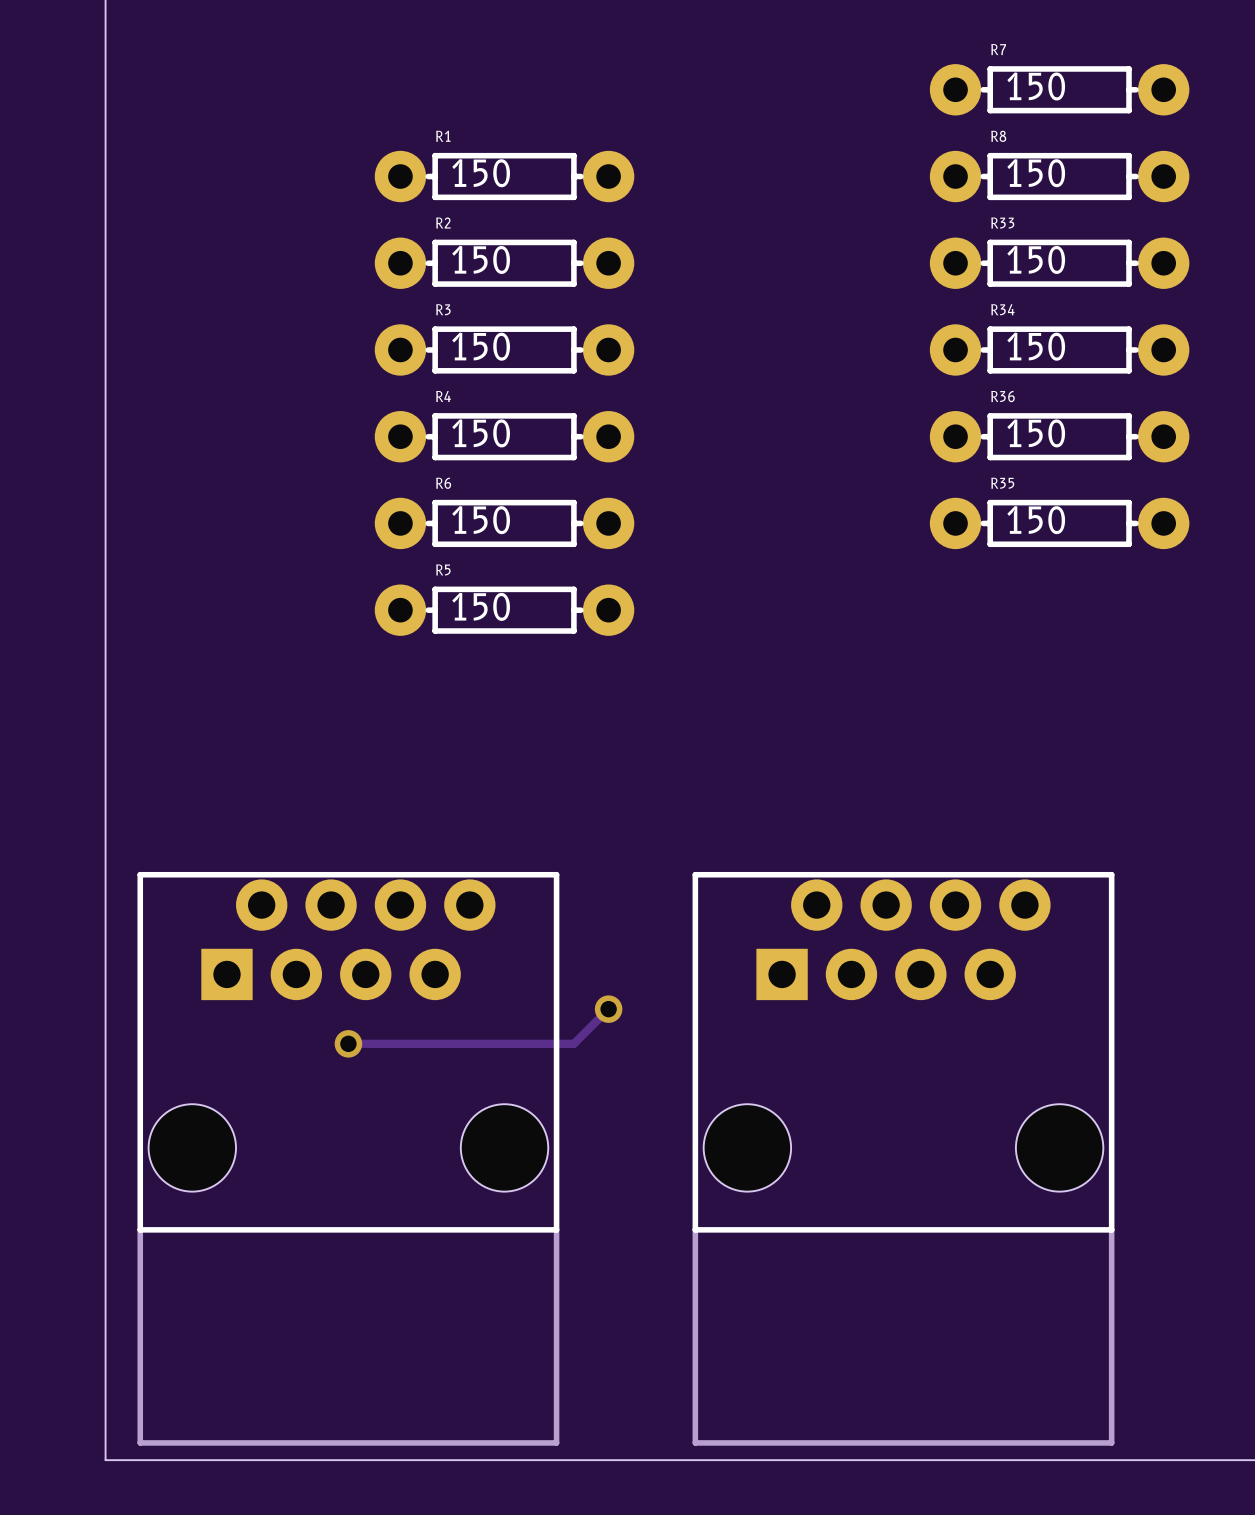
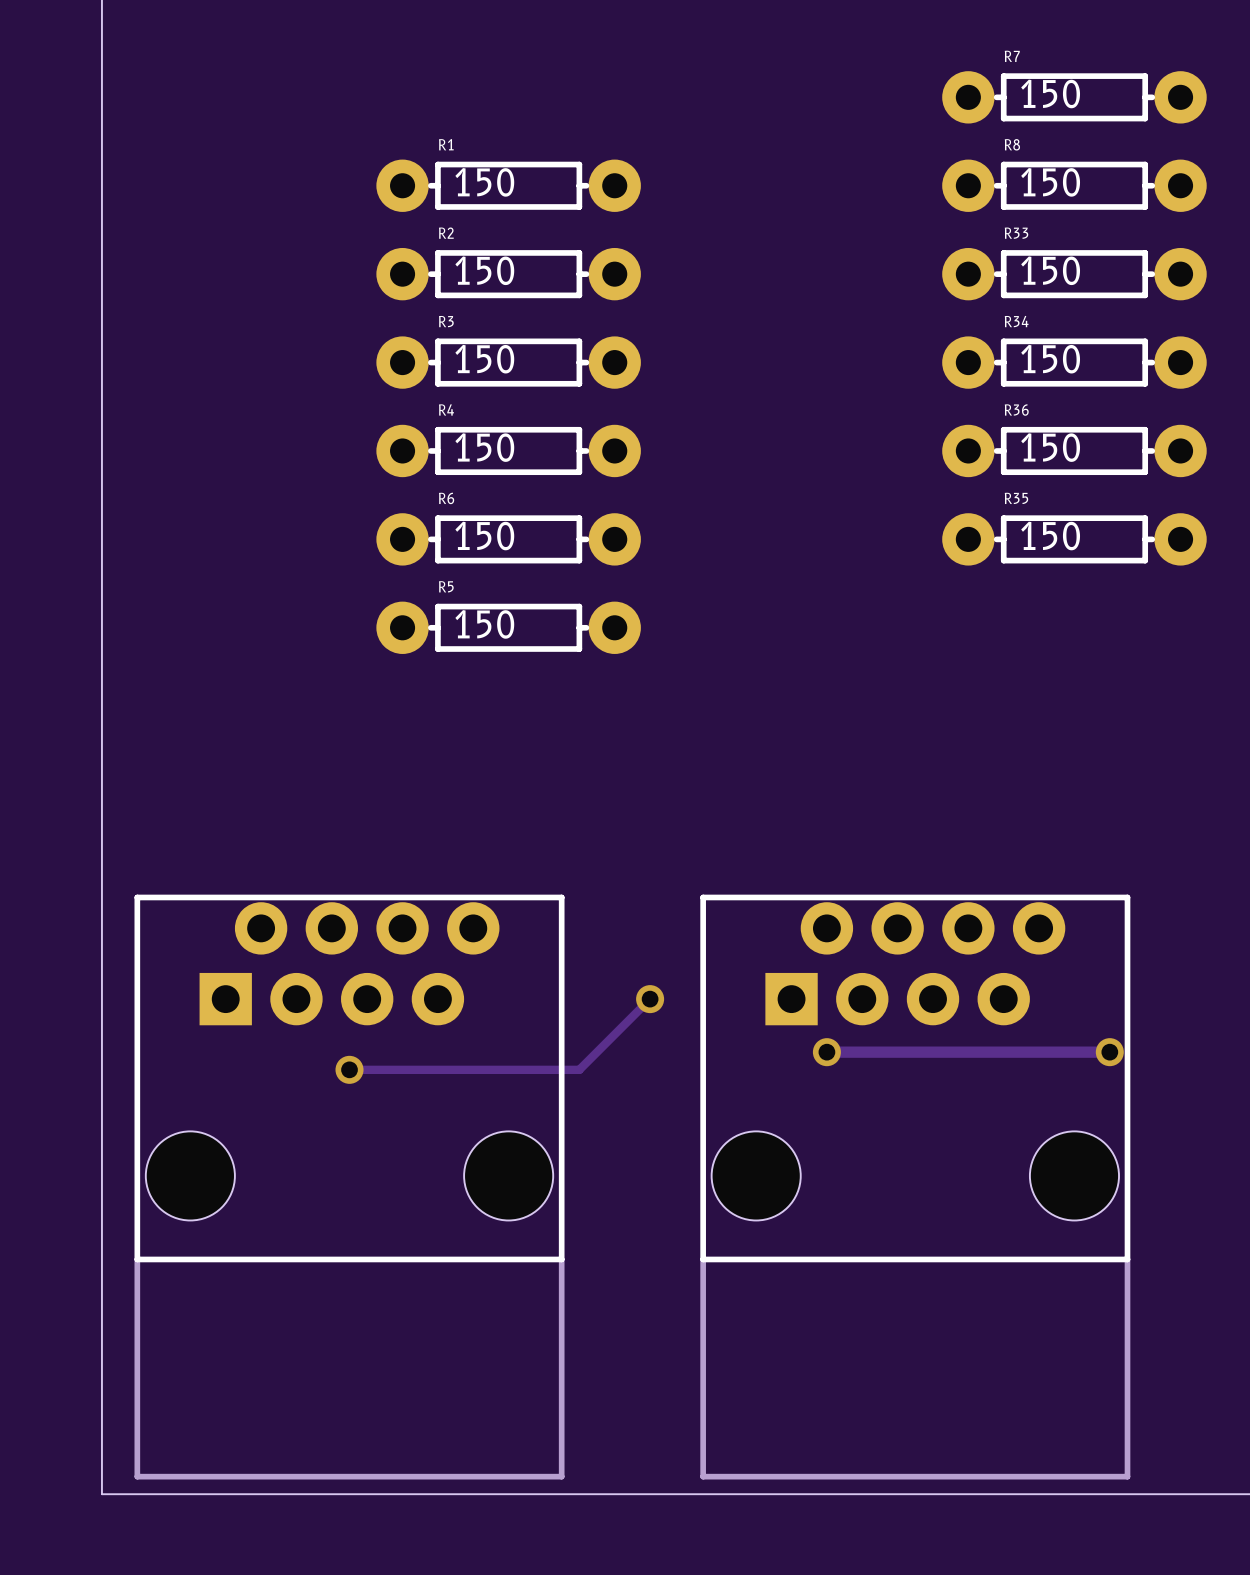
track: none -> (650, 999) (614, 1034)
via position: (608, 1009) -> (650, 999)
track: none -> (826, 1052) (1109, 1052)
via: none -> (826, 1052)
via: none -> (1109, 1052)

